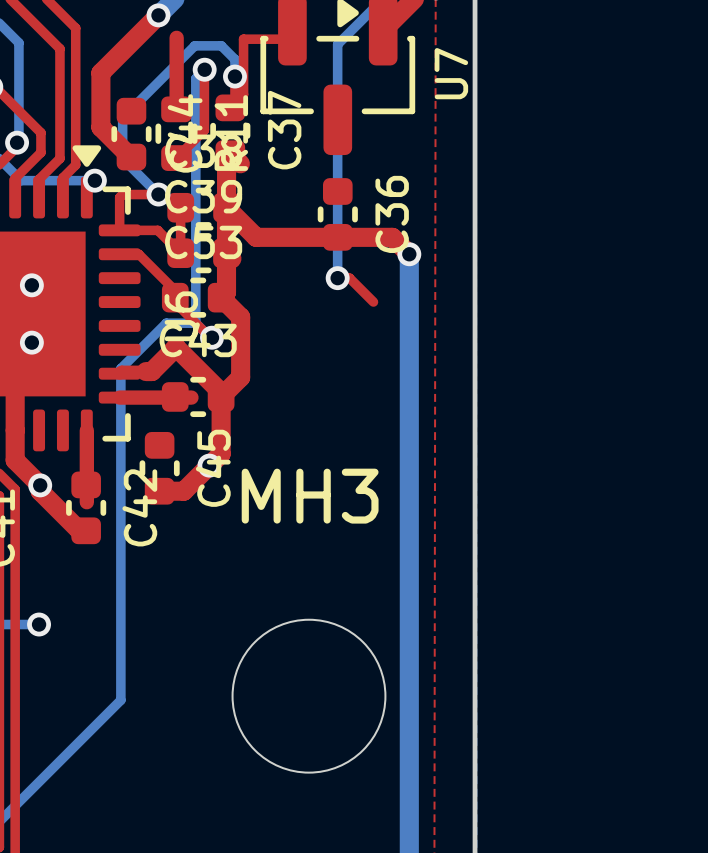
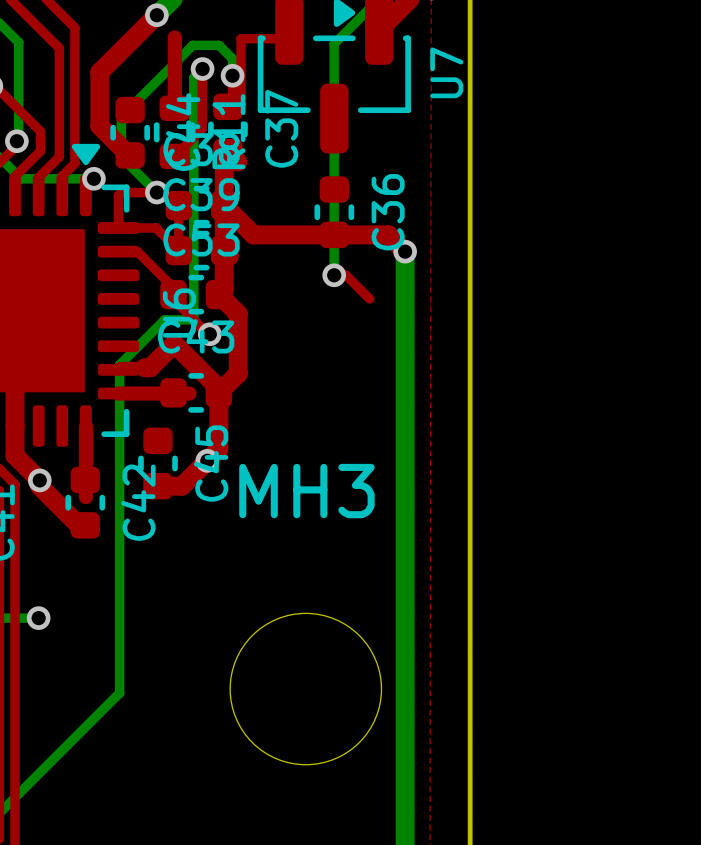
via: (31, 285) -> none
via: (31, 342) -> none

